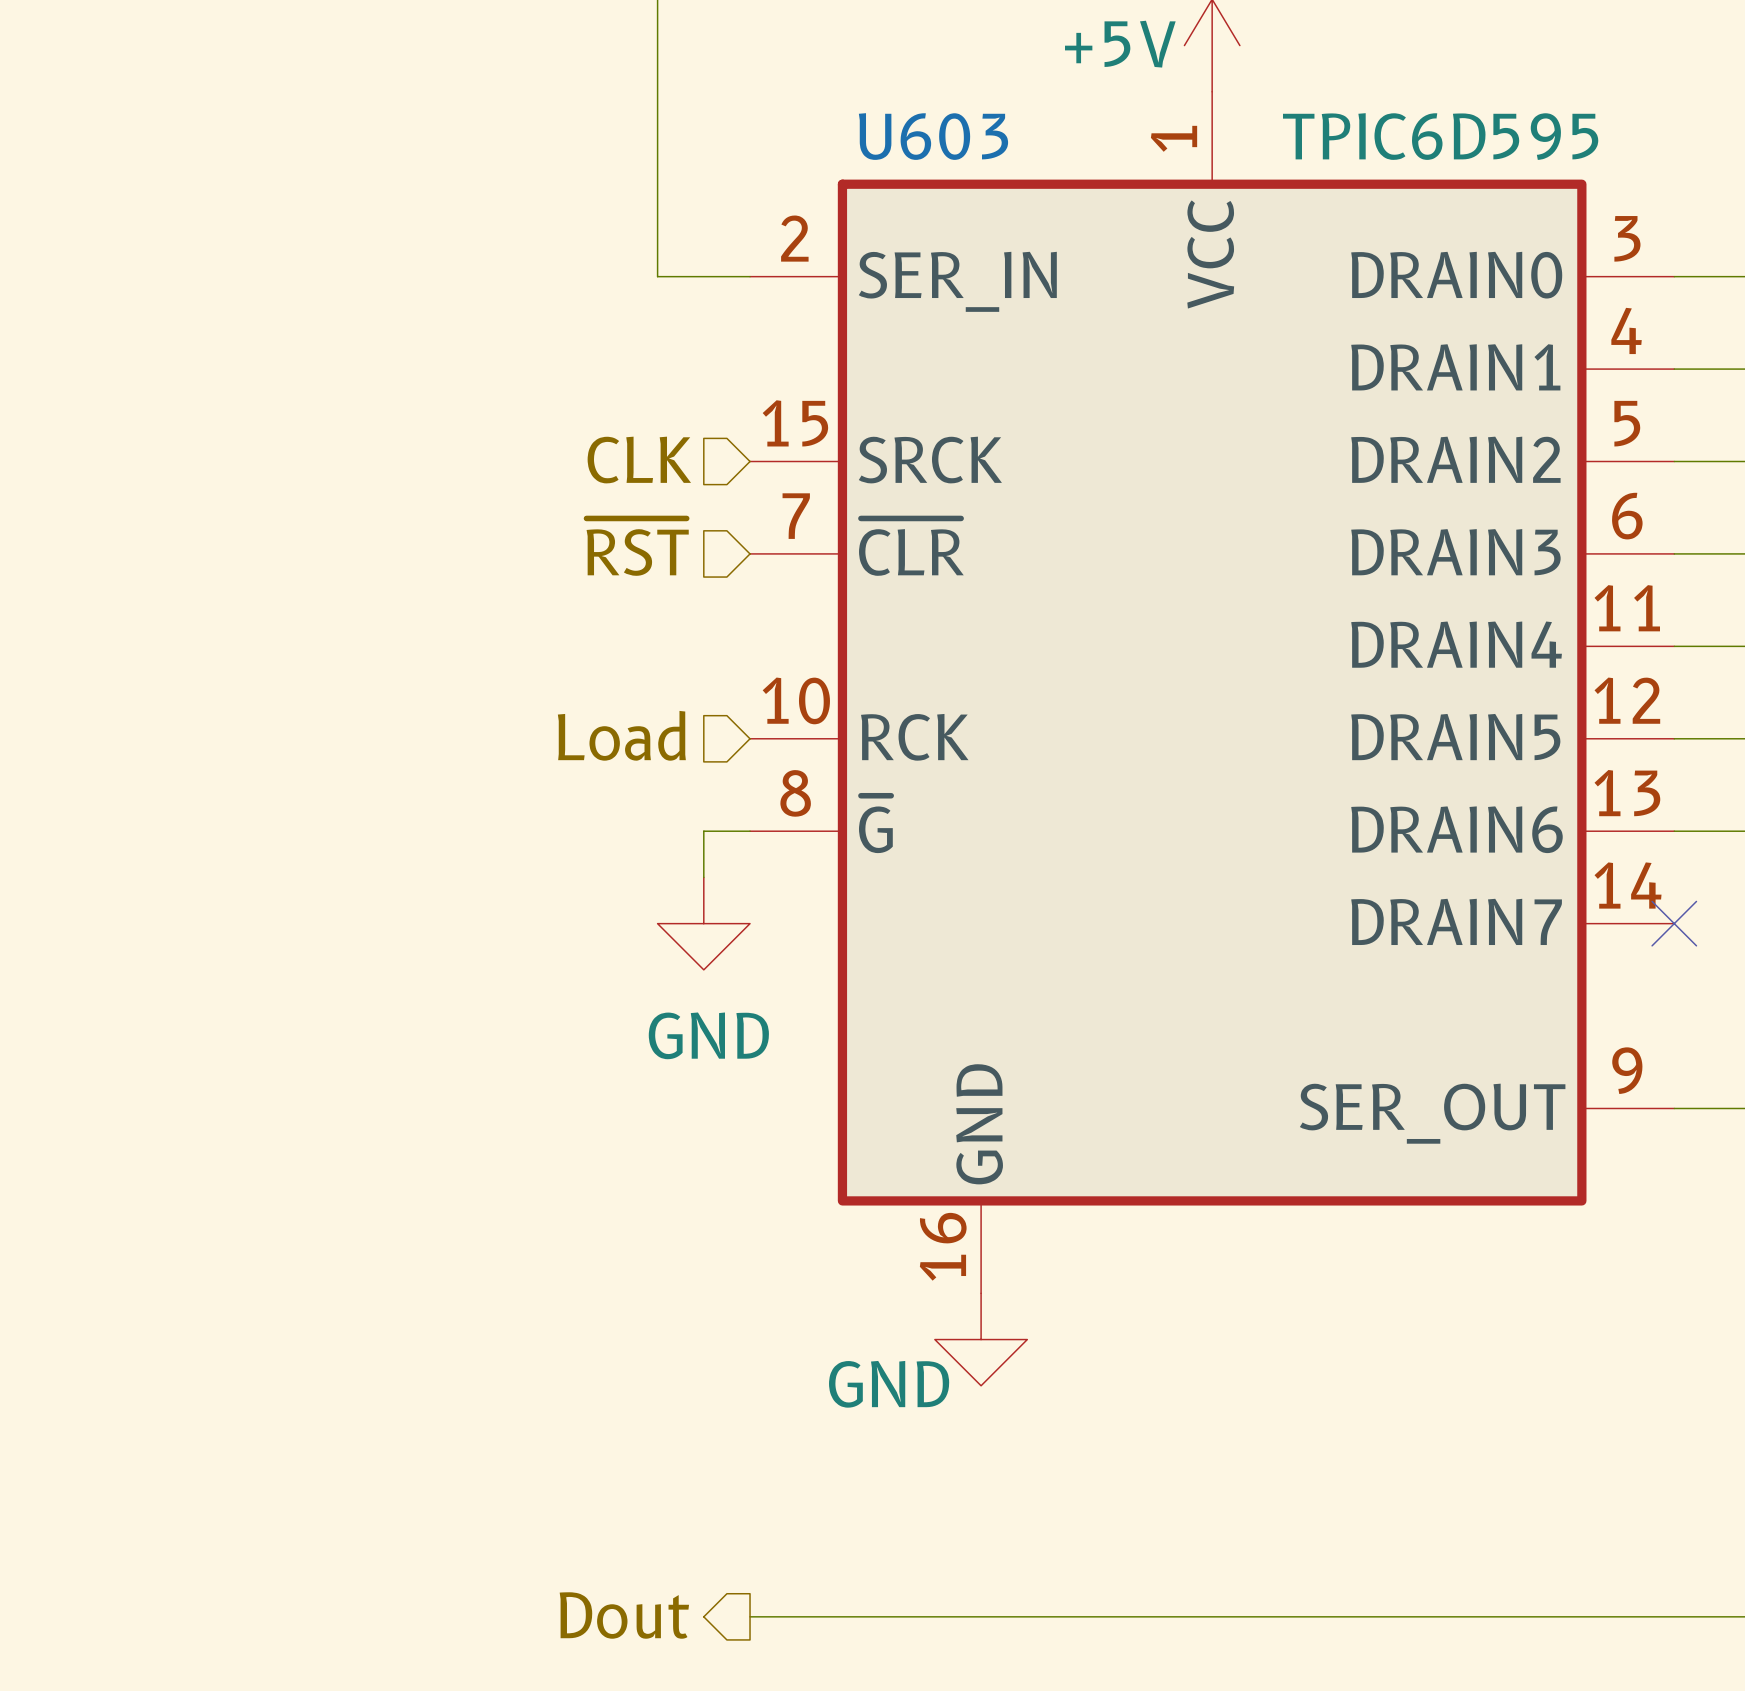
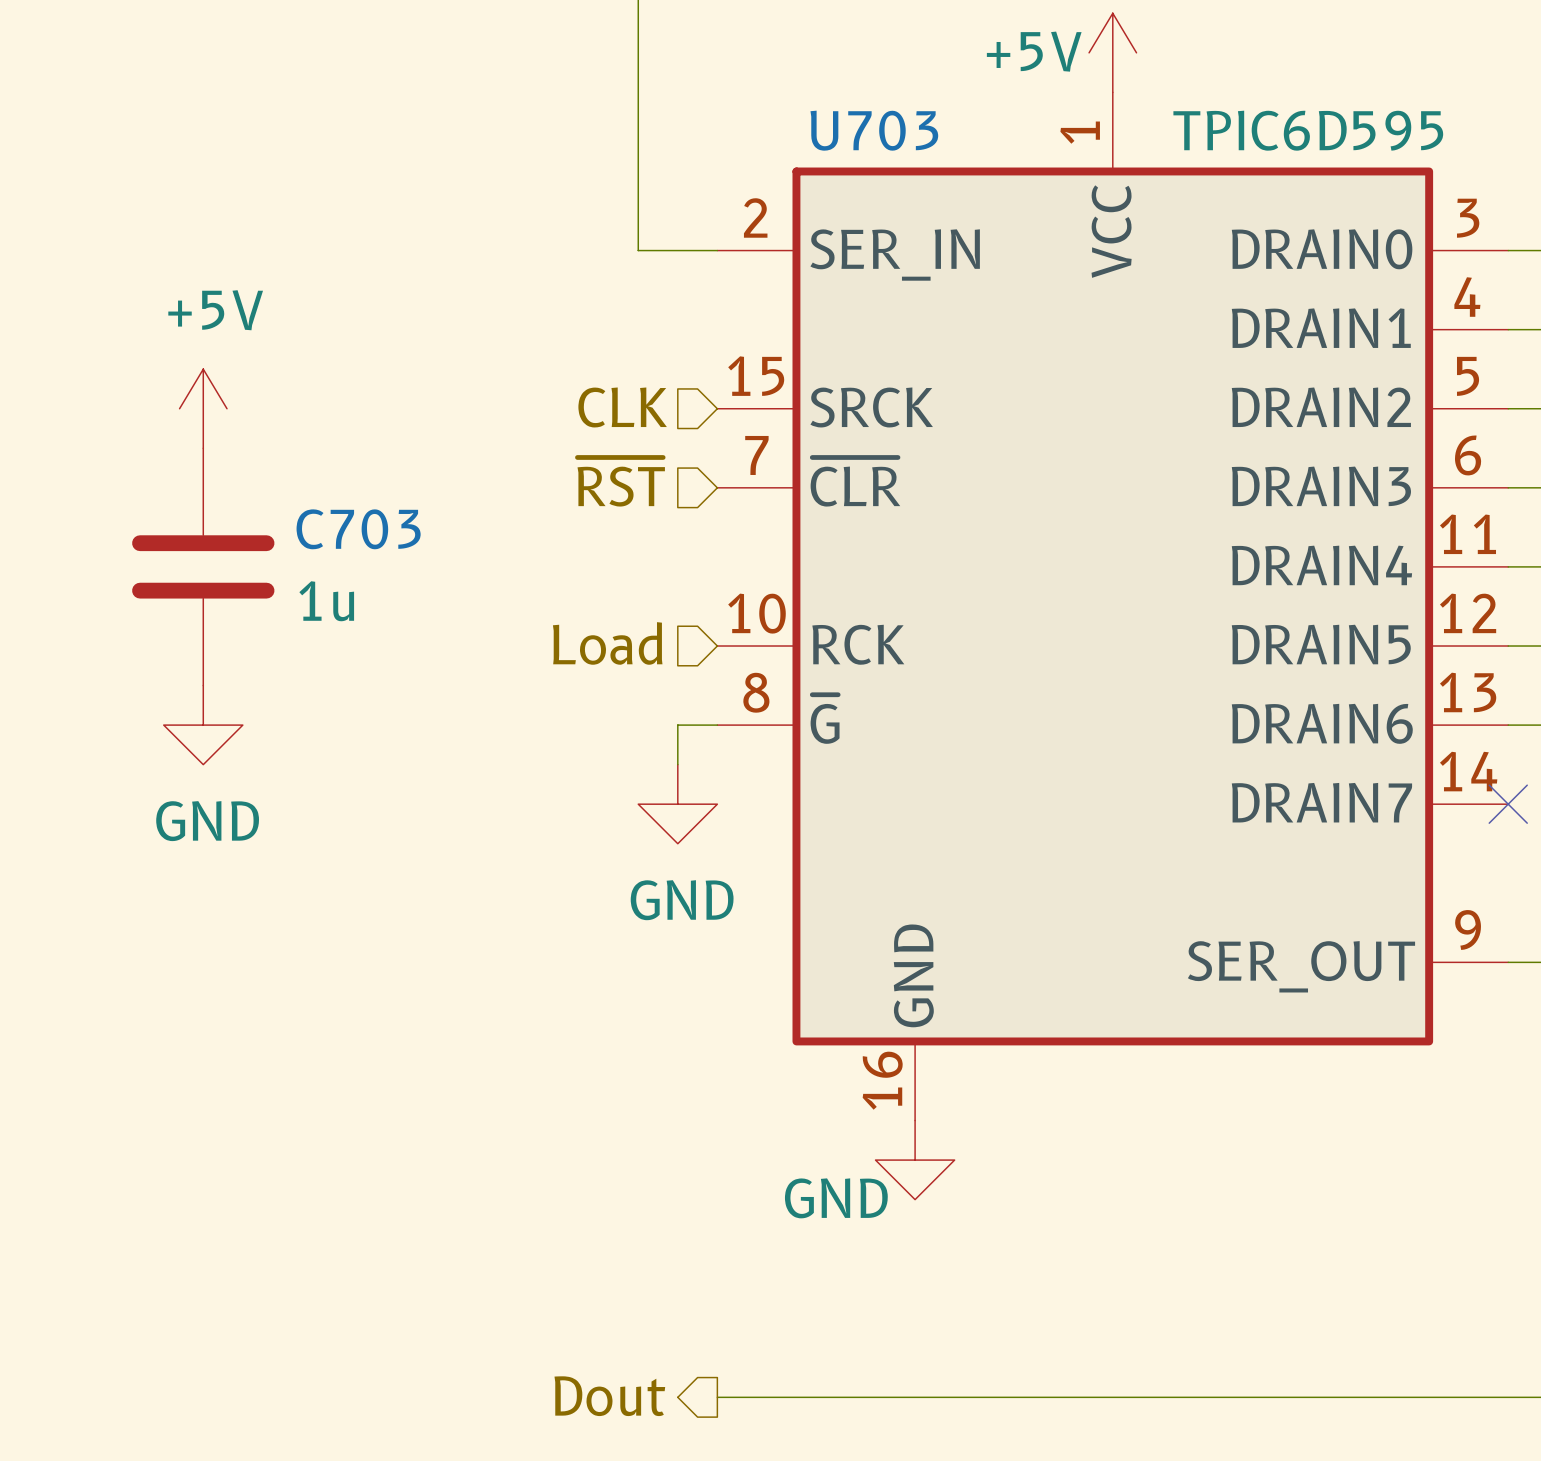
U603 name: U603 (933, 136) -> U703 (874, 130)
power symbol: none -> +5V (203, 408)
C703: none -> 1u (203, 566)
power symbol: none -> GND (203, 725)

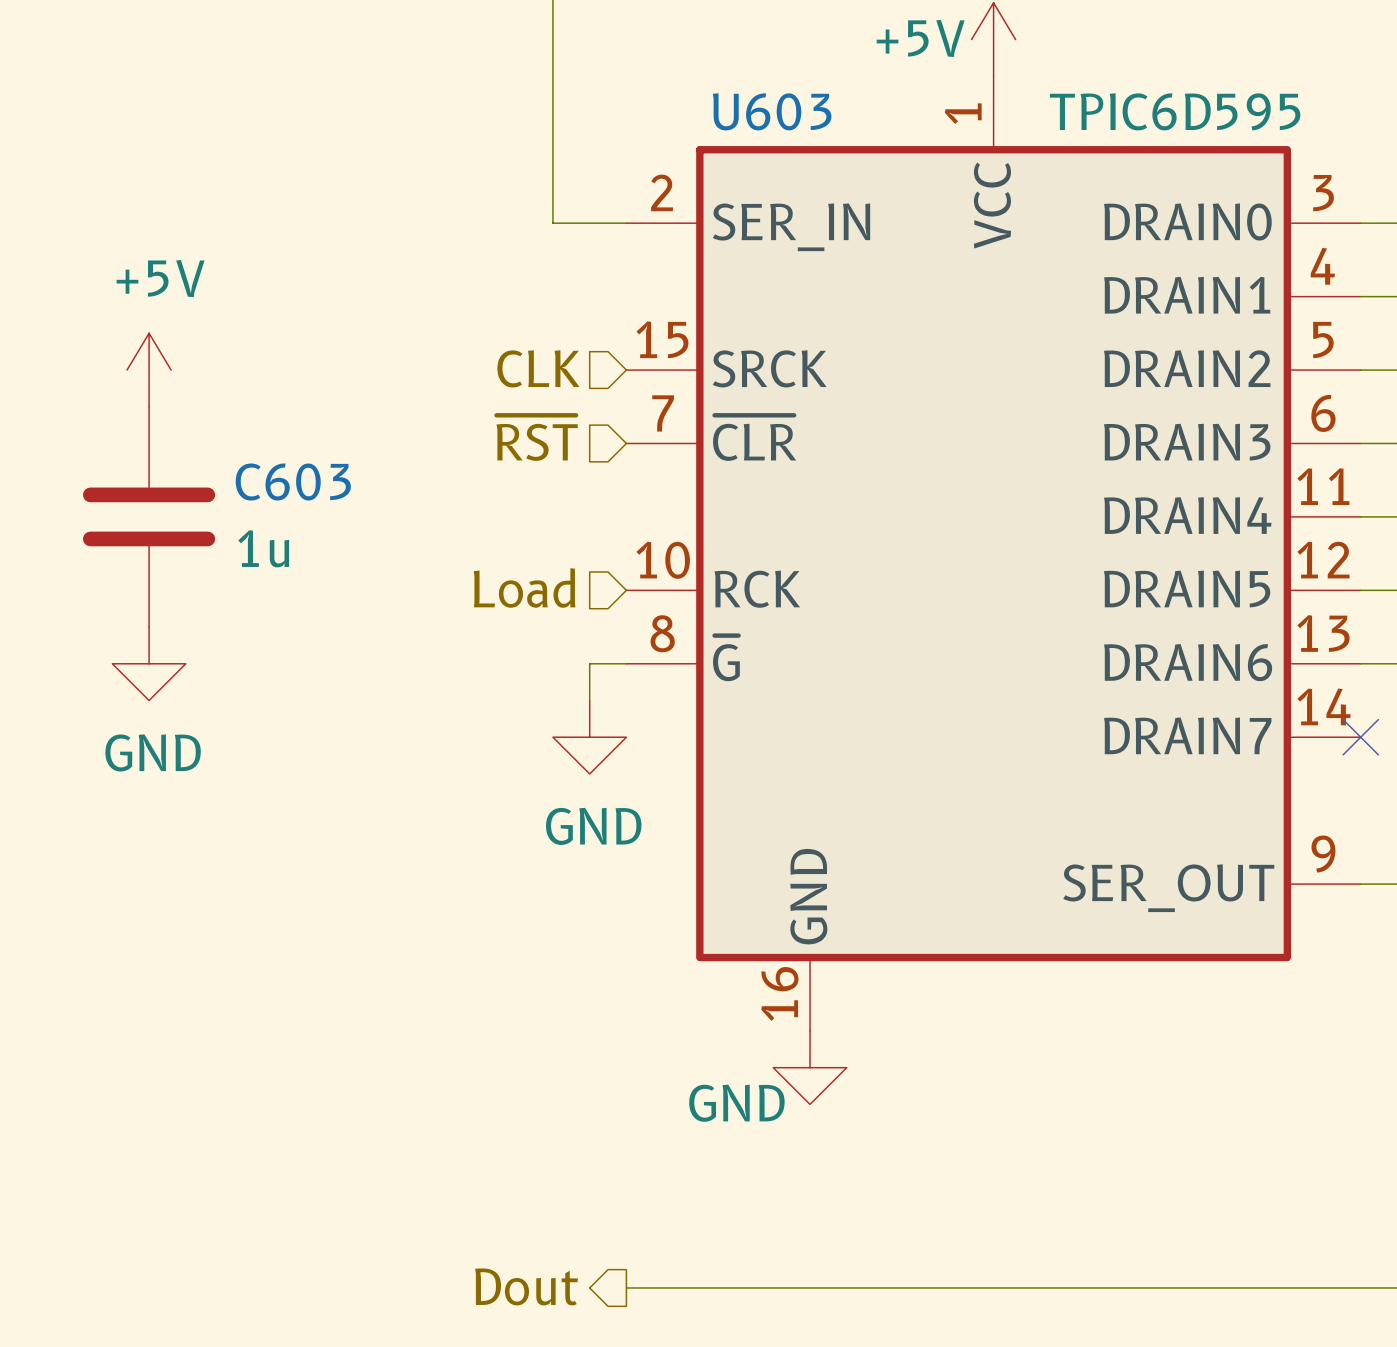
U703 name: U703 (874, 130) -> U603 (772, 111)
C703 name: C703 (358, 529) -> C603 (293, 482)

